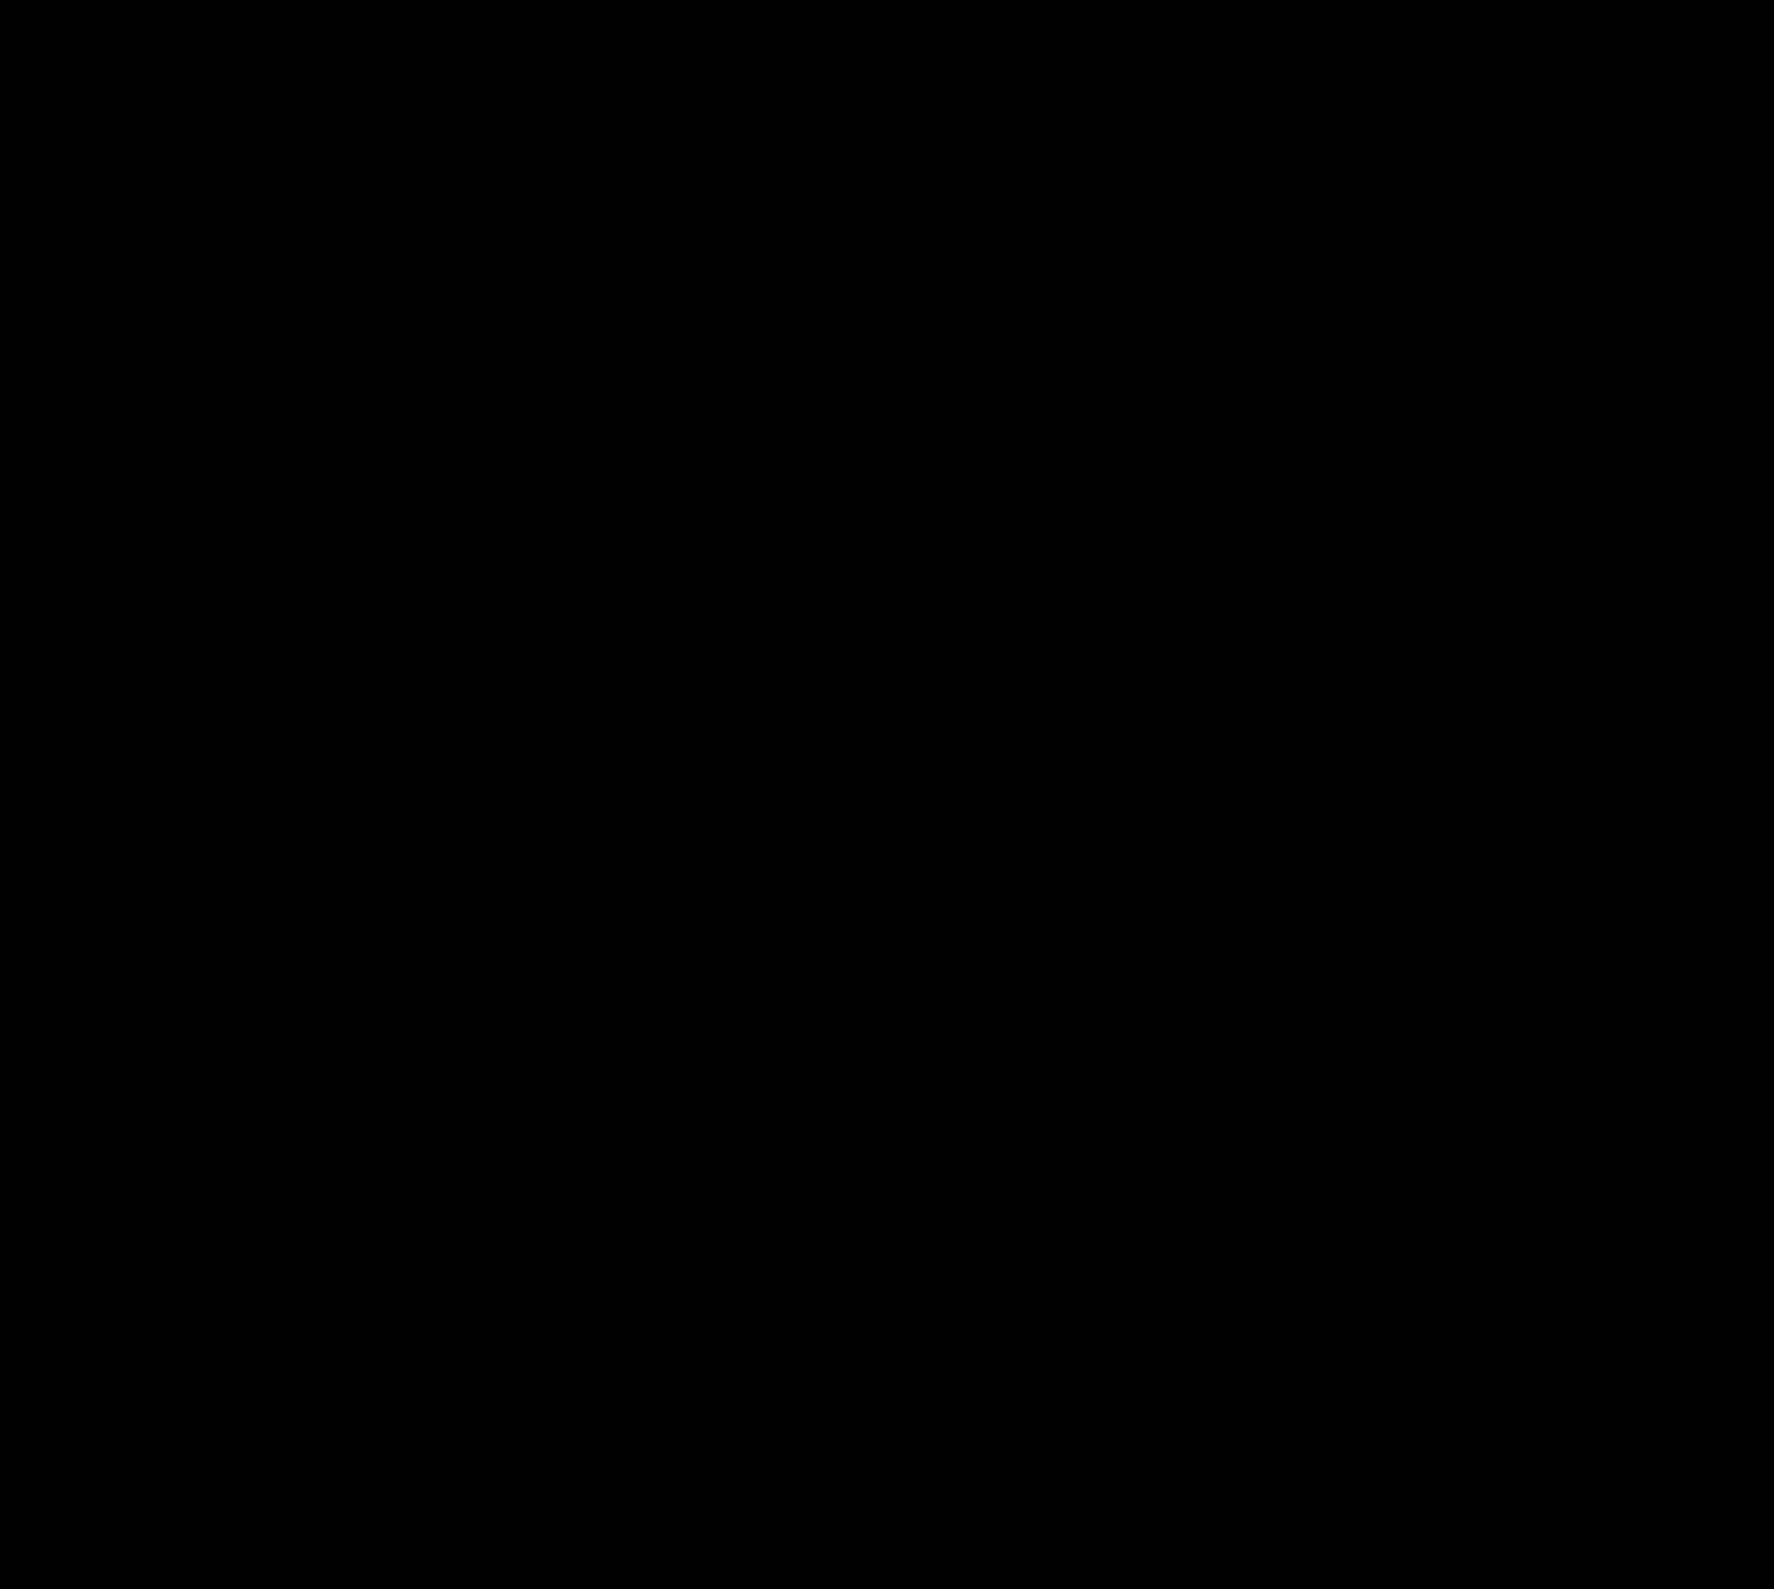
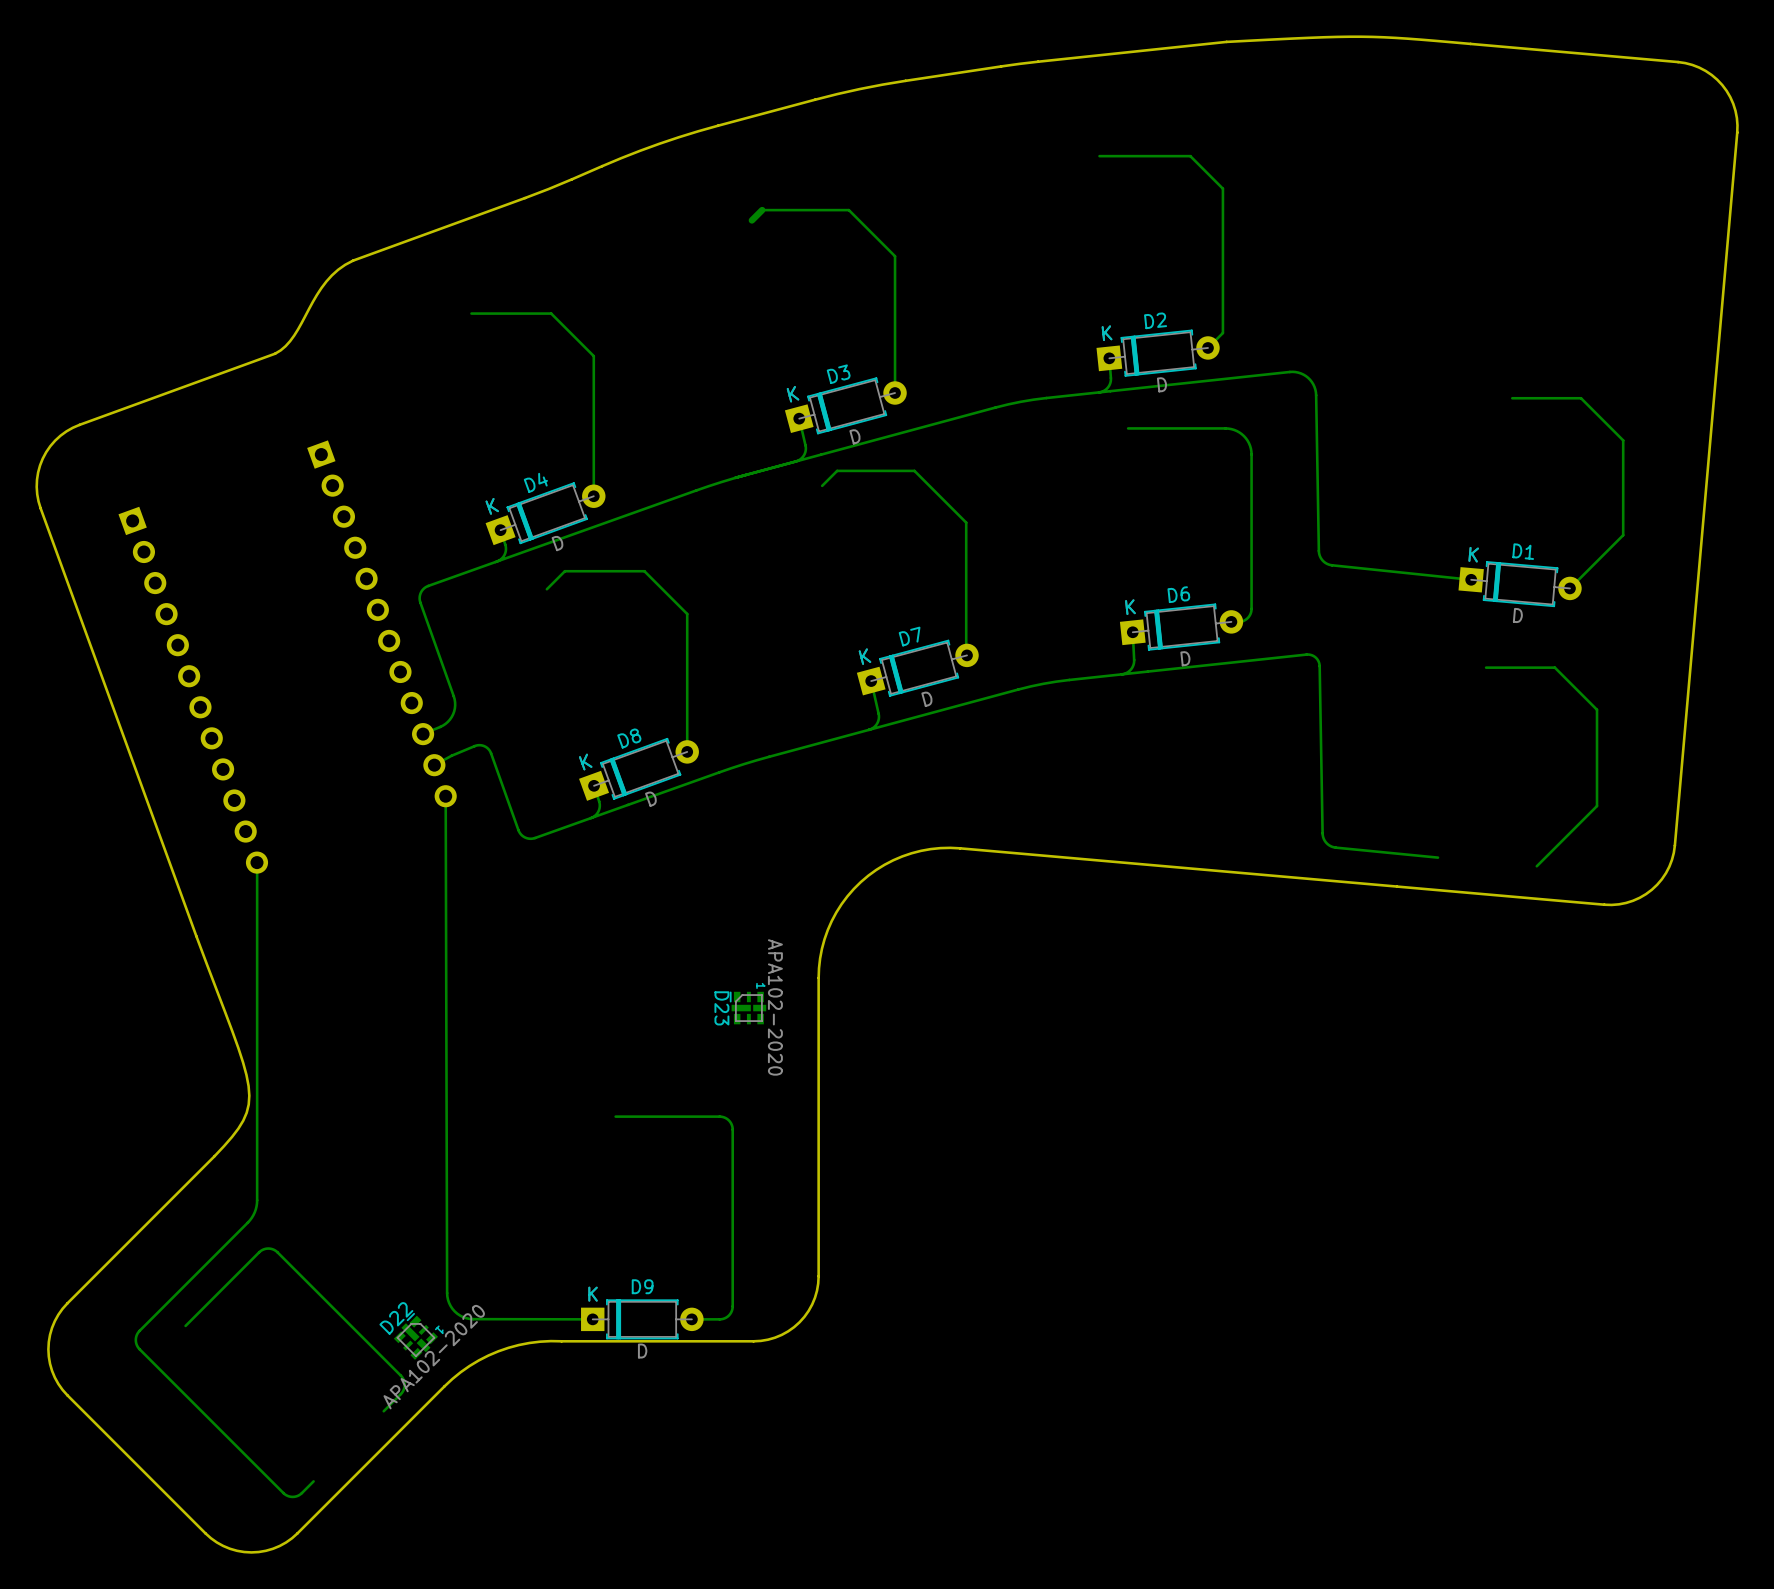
board edge: none -> (1226, 41) (1019, 63) (882, 84) (814, 99) (659, 143) (548, 189) (353, 260) (338, 269) (326, 281) (294, 335) (280, 350) (72, 427) (55, 440) (46, 452) (40, 465) (37, 479) (37, 494) (40, 508) (238, 1048) (246, 1074) (249, 1095) (243, 1120) (224, 1146) (62, 1308) (52, 1327) (48, 1342) (48, 1356) (54, 1377) (67, 1395) (205, 1533) (216, 1542) (237, 1550) (251, 1552) (272, 1548) (286, 1542) (297, 1533) (452, 1378) (469, 1365) (498, 1351) (518, 1345) (550, 1341) (760, 1340) (781, 1334) (799, 1322) (812, 1304) (818, 1283) (818, 977) (821, 948) (831, 921) (847, 896) (868, 875) (893, 860) (930, 849) (960, 848) (1611, 904) (1626, 902) (1639, 897) (1651, 889) (1661, 879) (1671, 859) (1674, 845) (1737, 132) (1735, 110) (1730, 97) (1722, 85) (1711, 75) (1699, 67) (1678, 62) (1383, 37) (1323, 37) (1226, 41)
track: none -> (1099, 156) (1190, 156) (1222, 188) (1222, 333) (1207, 347)
track: none -> (751, 220) (762, 210) (848, 210) (895, 256) (895, 393)
track: none -> (471, 313) (551, 313) (593, 356) (593, 496)
D2: none -> D (1158, 353)
track: none -> (1109, 358) (1110, 383) (1105, 389) (1098, 392)
track: none -> (1512, 398) (1581, 398) (1623, 440) (1623, 535) (1569, 588)
D3: none -> D (845, 405)
track: none -> (799, 418) (805, 448) (802, 456) (795, 461)
track: none -> (1128, 428) (1228, 428) (1239, 432) (1248, 443) (1251, 454) (1251, 610) (1245, 620) (1231, 621)
track: none -> (746, 474) (696, 490) (424, 588) (420, 593) (419, 601) (453, 696) (455, 705) (453, 714) (447, 721) (423, 734)
track: none -> (735, 477) (1020, 401) (1295, 372) (1310, 379) (1315, 392) (1318, 550) (1322, 560) (1332, 565) (1471, 579)
track: none -> (822, 485) (837, 470) (914, 470) (966, 522) (967, 655)
D4: none -> D (545, 513)
track: none -> (500, 530) (505, 549) (503, 556) (497, 561)
D1: none -> D (1520, 584)
track: none -> (546, 589) (564, 571) (644, 571) (687, 614) (687, 751)
part: none -> (381, 623)
D6: none -> D (1181, 627)
track: none -> (1132, 632) (1133, 663) (1129, 670) (1121, 674)
track: none -> (1486, 667) (1554, 667) (1597, 709) (1597, 806) (1536, 866)
D7: none -> D (917, 668)
track: none -> (871, 681) (878, 717) (876, 725) (868, 729)
part: none -> (193, 690)
track: none -> (434, 765) (476, 745) (486, 747) (491, 753) (519, 831) (525, 837) (531, 838) (744, 764) (1030, 686) (1069, 679) (1309, 654) (1315, 657) (1319, 664) (1322, 833) (1325, 841) (1335, 847) (1438, 857)
D8: none -> D (638, 769)
track: none -> (594, 785) (599, 806) (597, 812) (590, 818)
track: none -> (445, 796) (448, 1299) (457, 1313) (469, 1318) (592, 1319)
track: none -> (257, 862) (255, 1209) (247, 1222) (139, 1330) (135, 1341) (139, 1349) (284, 1494) (290, 1496) (297, 1495) (313, 1481)
D23: none -> APA102-2020 (748, 1007)
track: none -> (615, 1116) (721, 1116) (727, 1119) (731, 1125) (732, 1309) (728, 1315) (723, 1318) (691, 1319)
D9: none -> D (642, 1319)
track: none -> (185, 1325) (260, 1251) (266, 1248) (273, 1249) (402, 1377) (404, 1384) (402, 1391) (383, 1411)
D22: none -> APA102-2020 (415, 1336)

